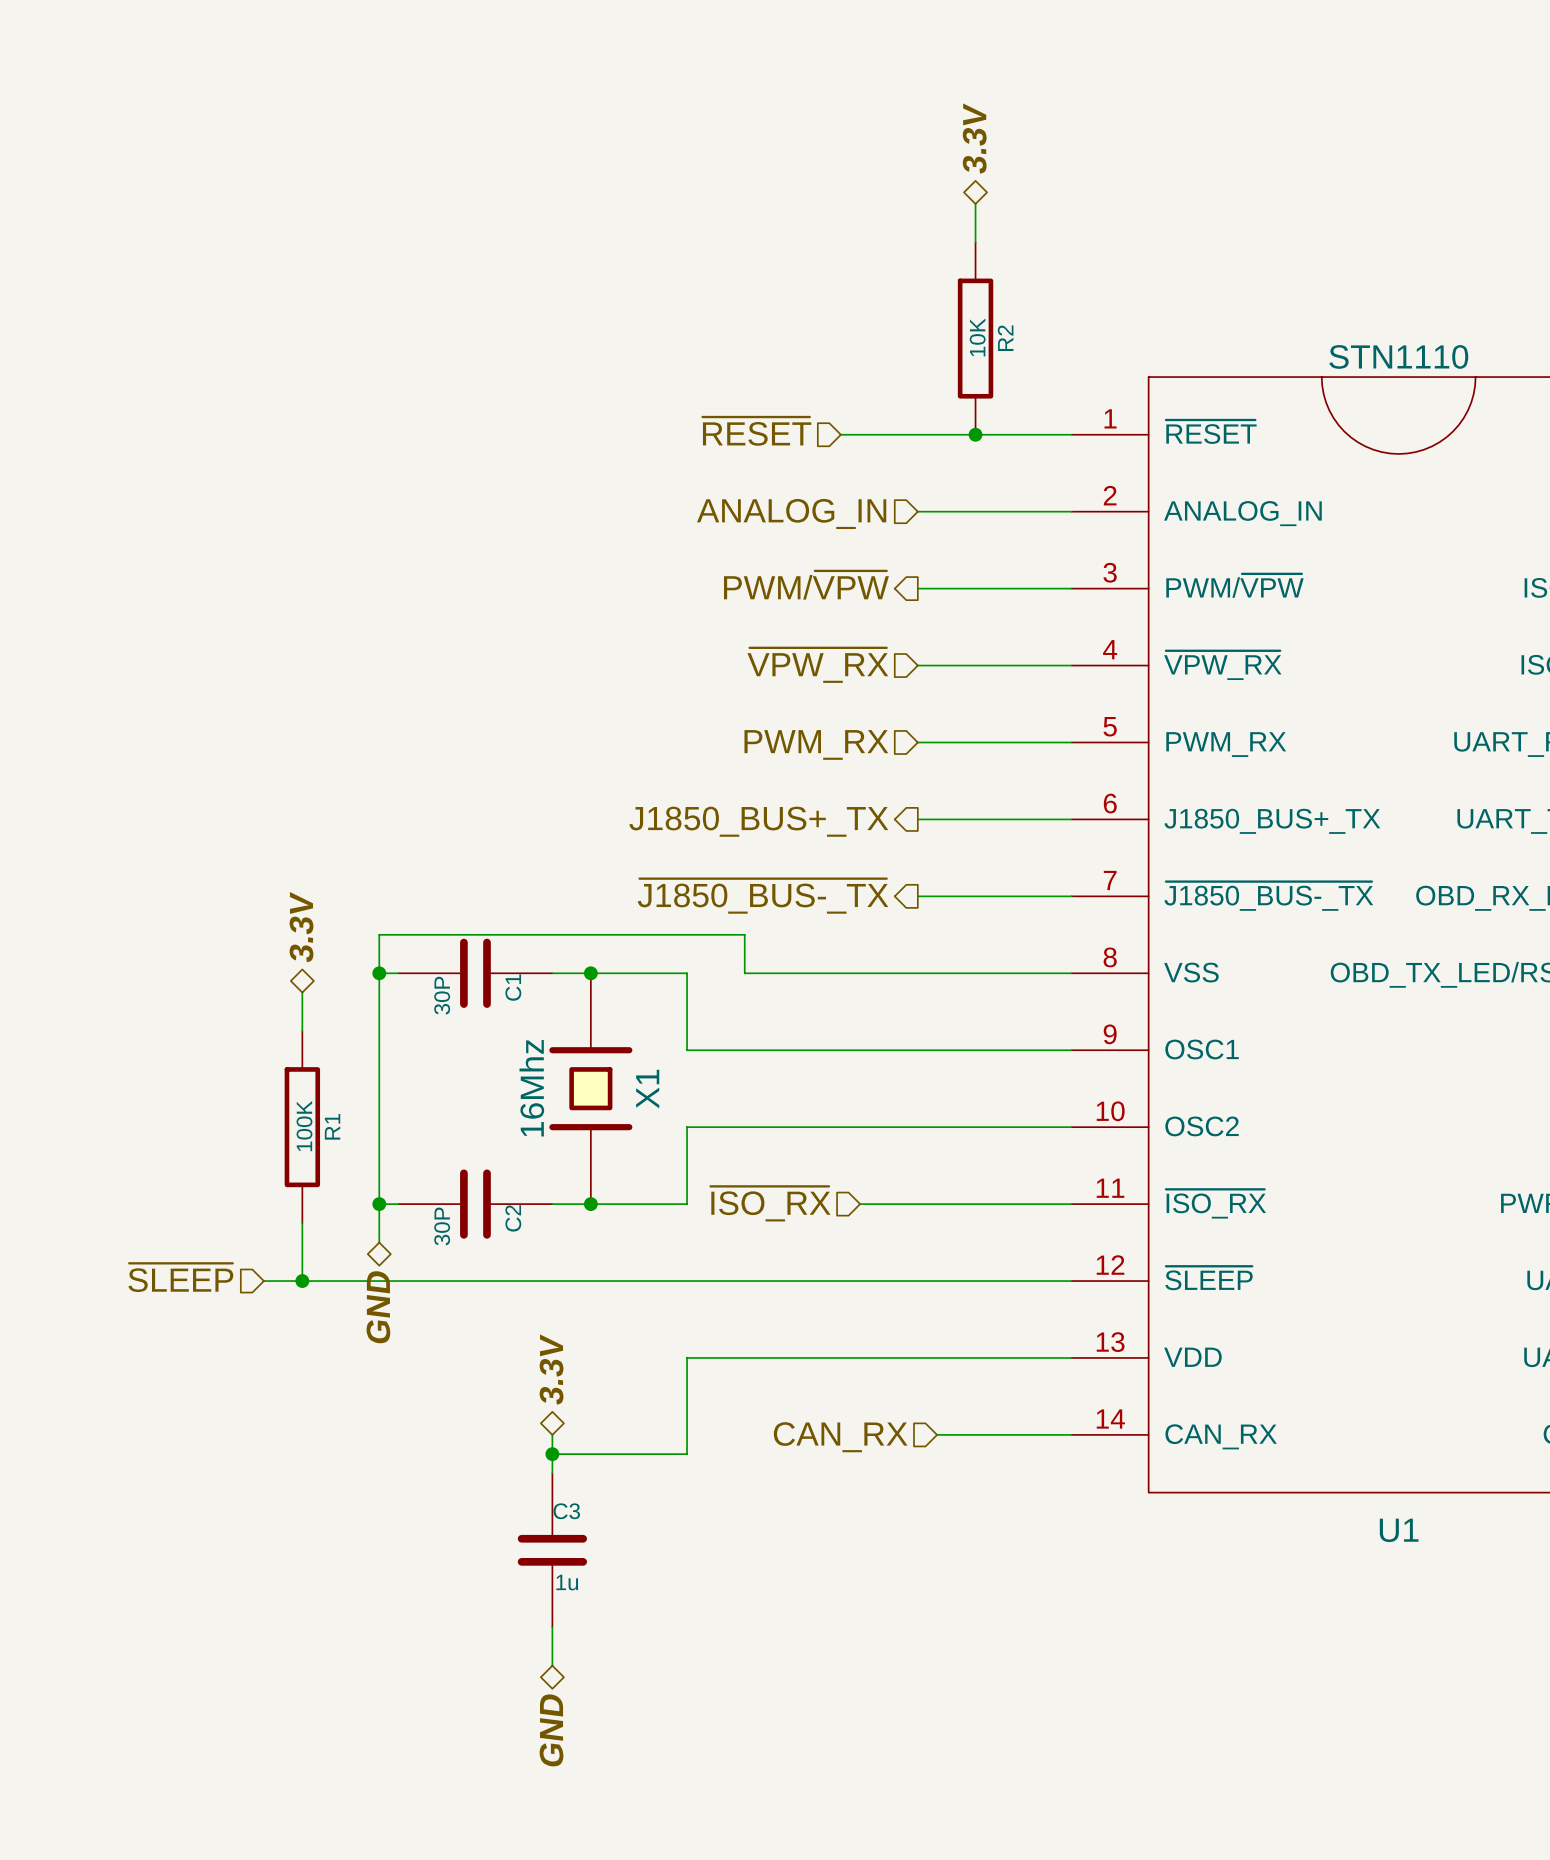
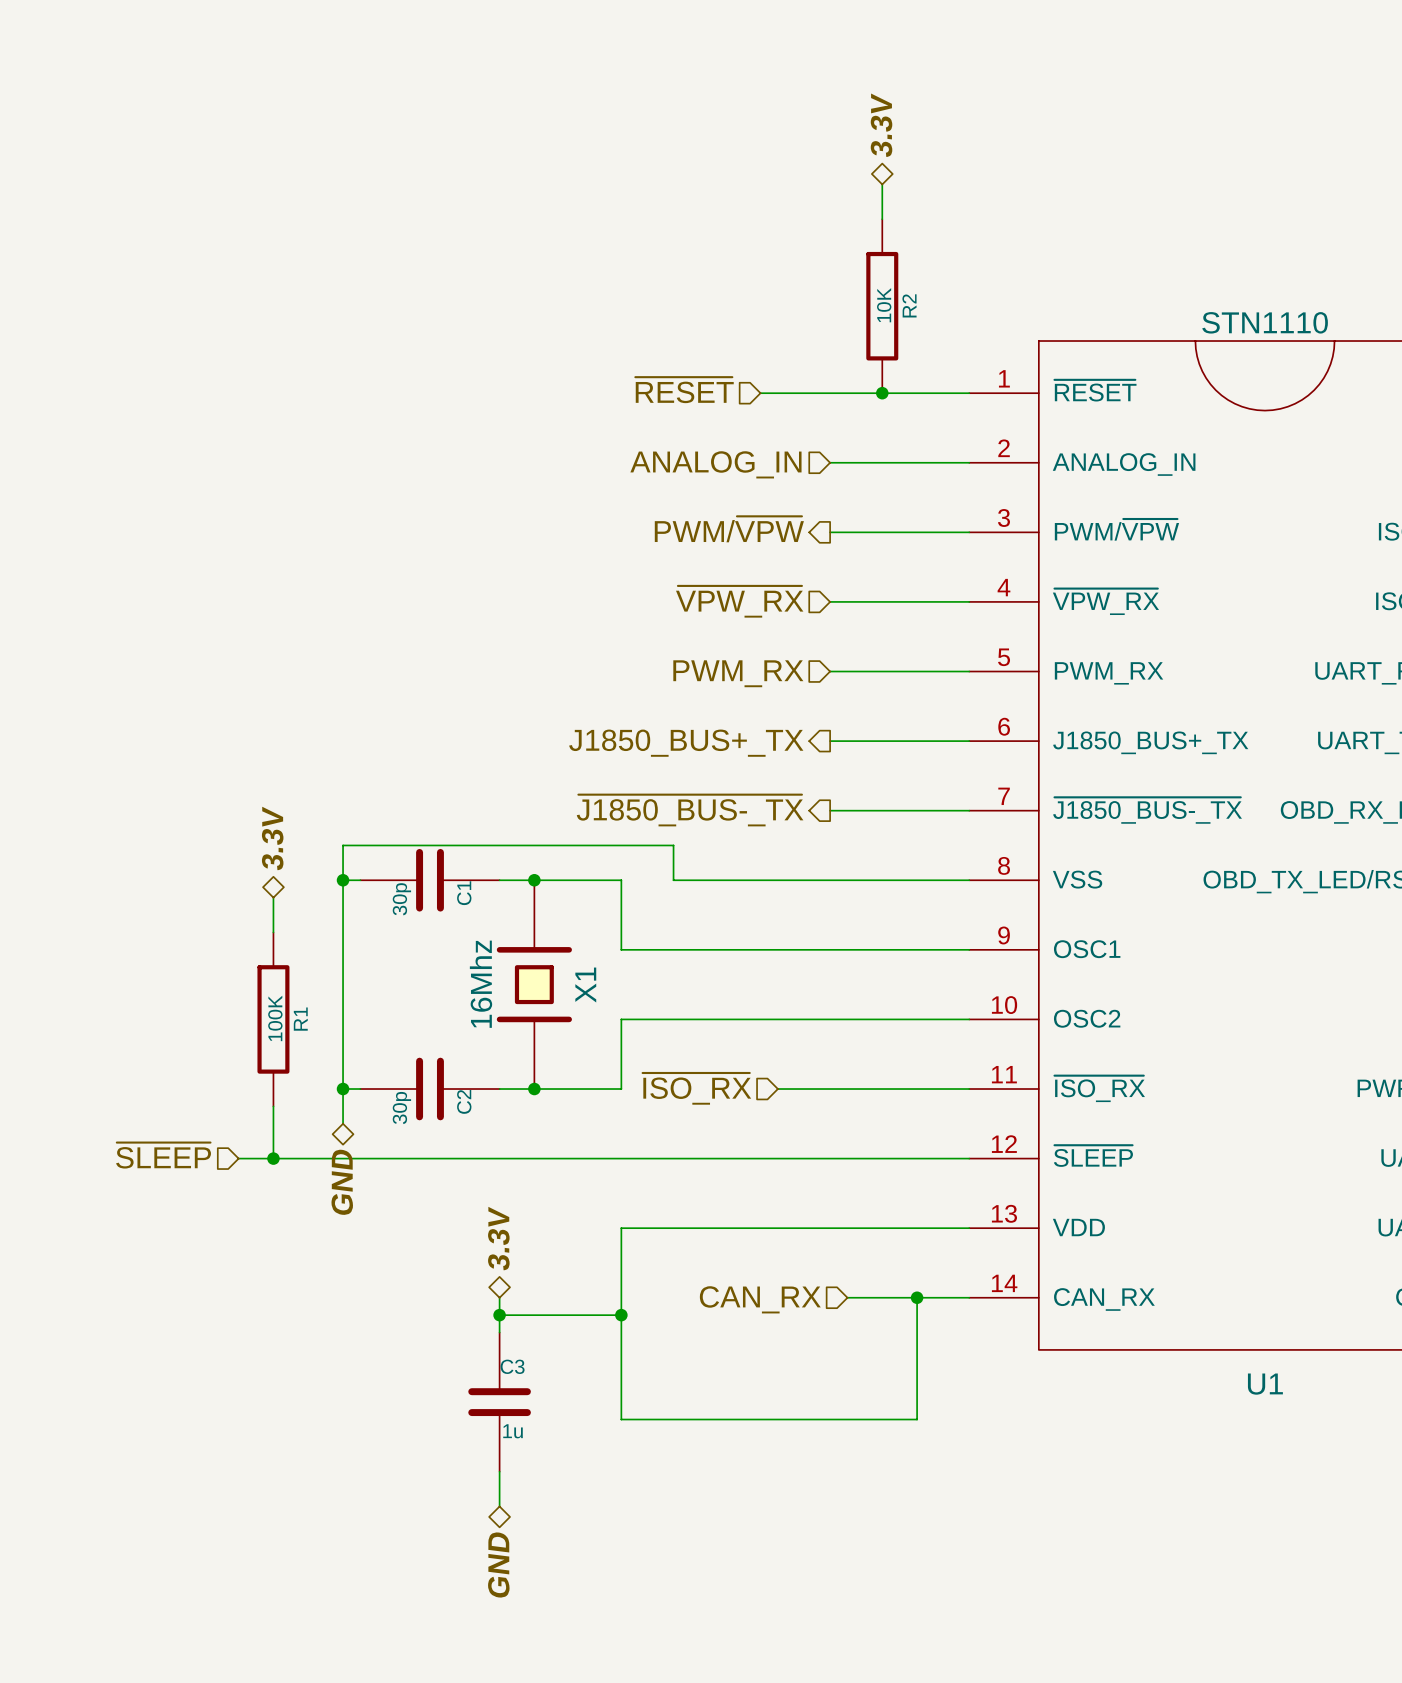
C1 value: 30P (442, 995) -> 30p (401, 899)
C2 value: 30P (442, 1226) -> 30p (401, 1108)
wire: none -> (917, 1297) (917, 1419) (621, 1419) (621, 1315)
junction: none -> (917, 1297)
junction: none -> (621, 1315)

